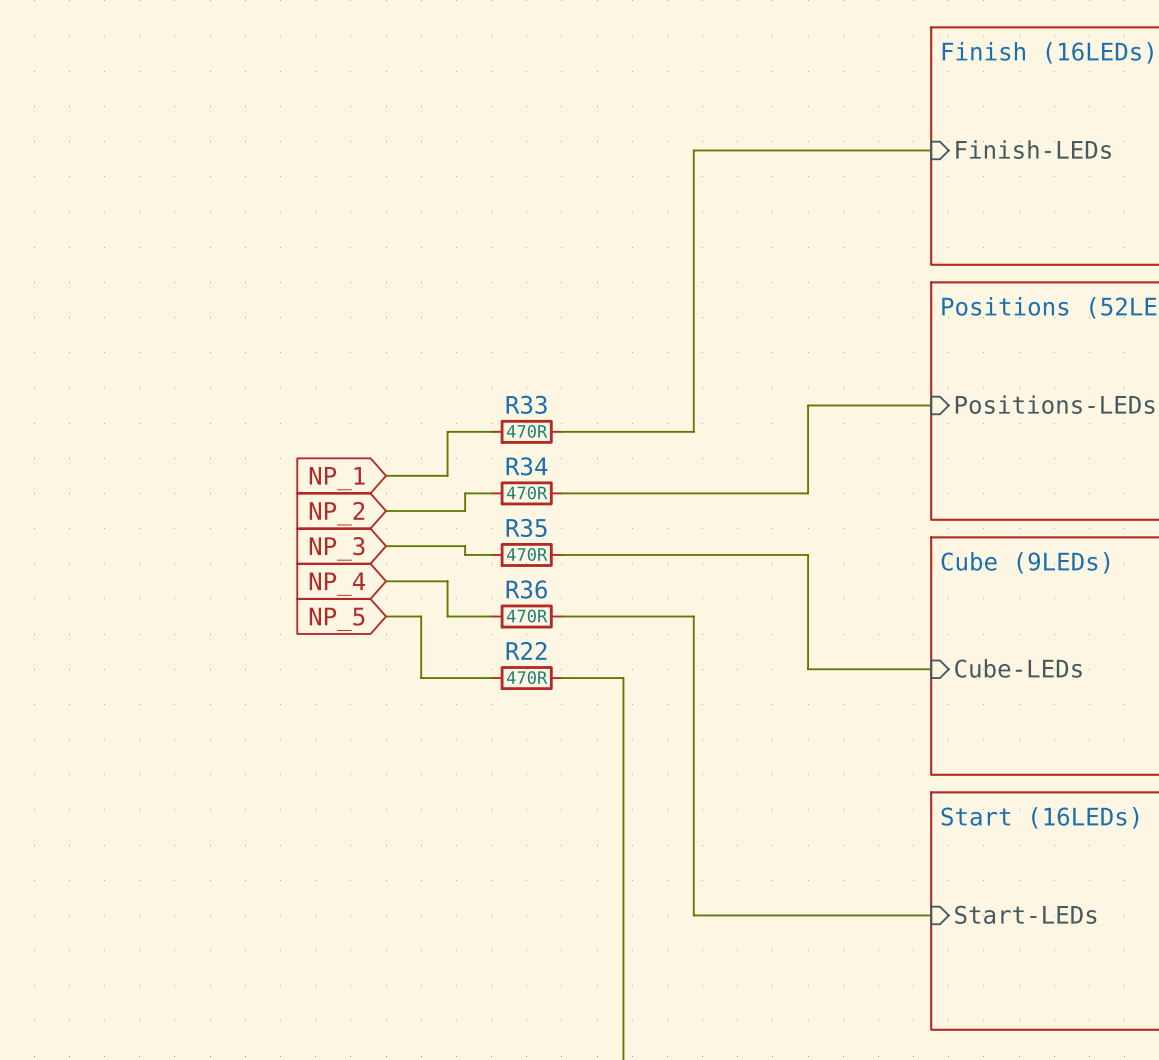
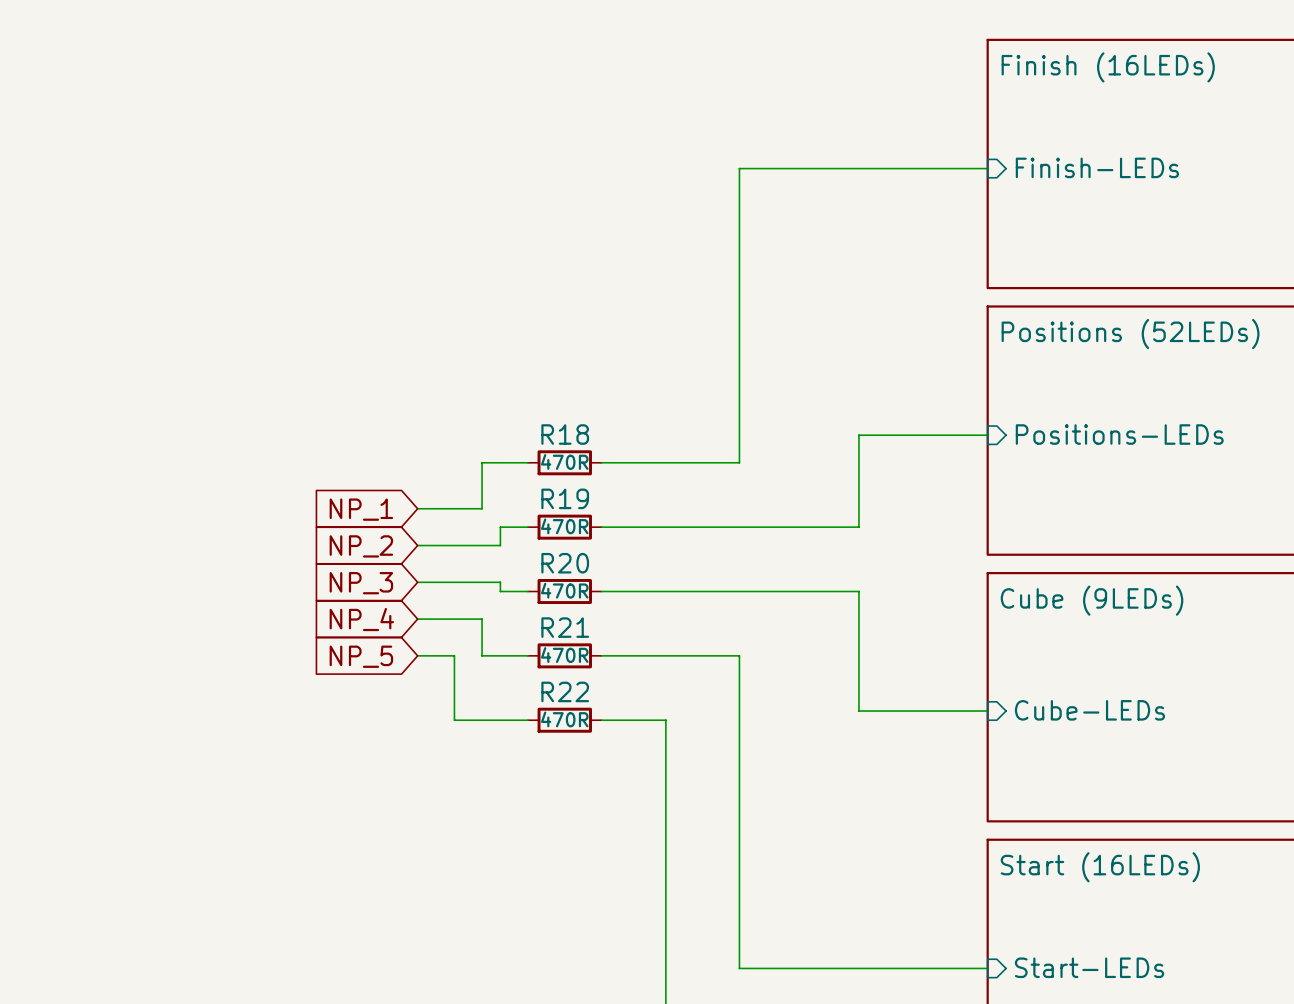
R33 name: R33 (526, 404) -> R18 (565, 434)
R34 name: R34 (526, 466) -> R19 (565, 498)
R35 name: R35 (526, 527) -> R20 (565, 563)
R36 name: R36 (526, 589) -> R21 (565, 627)

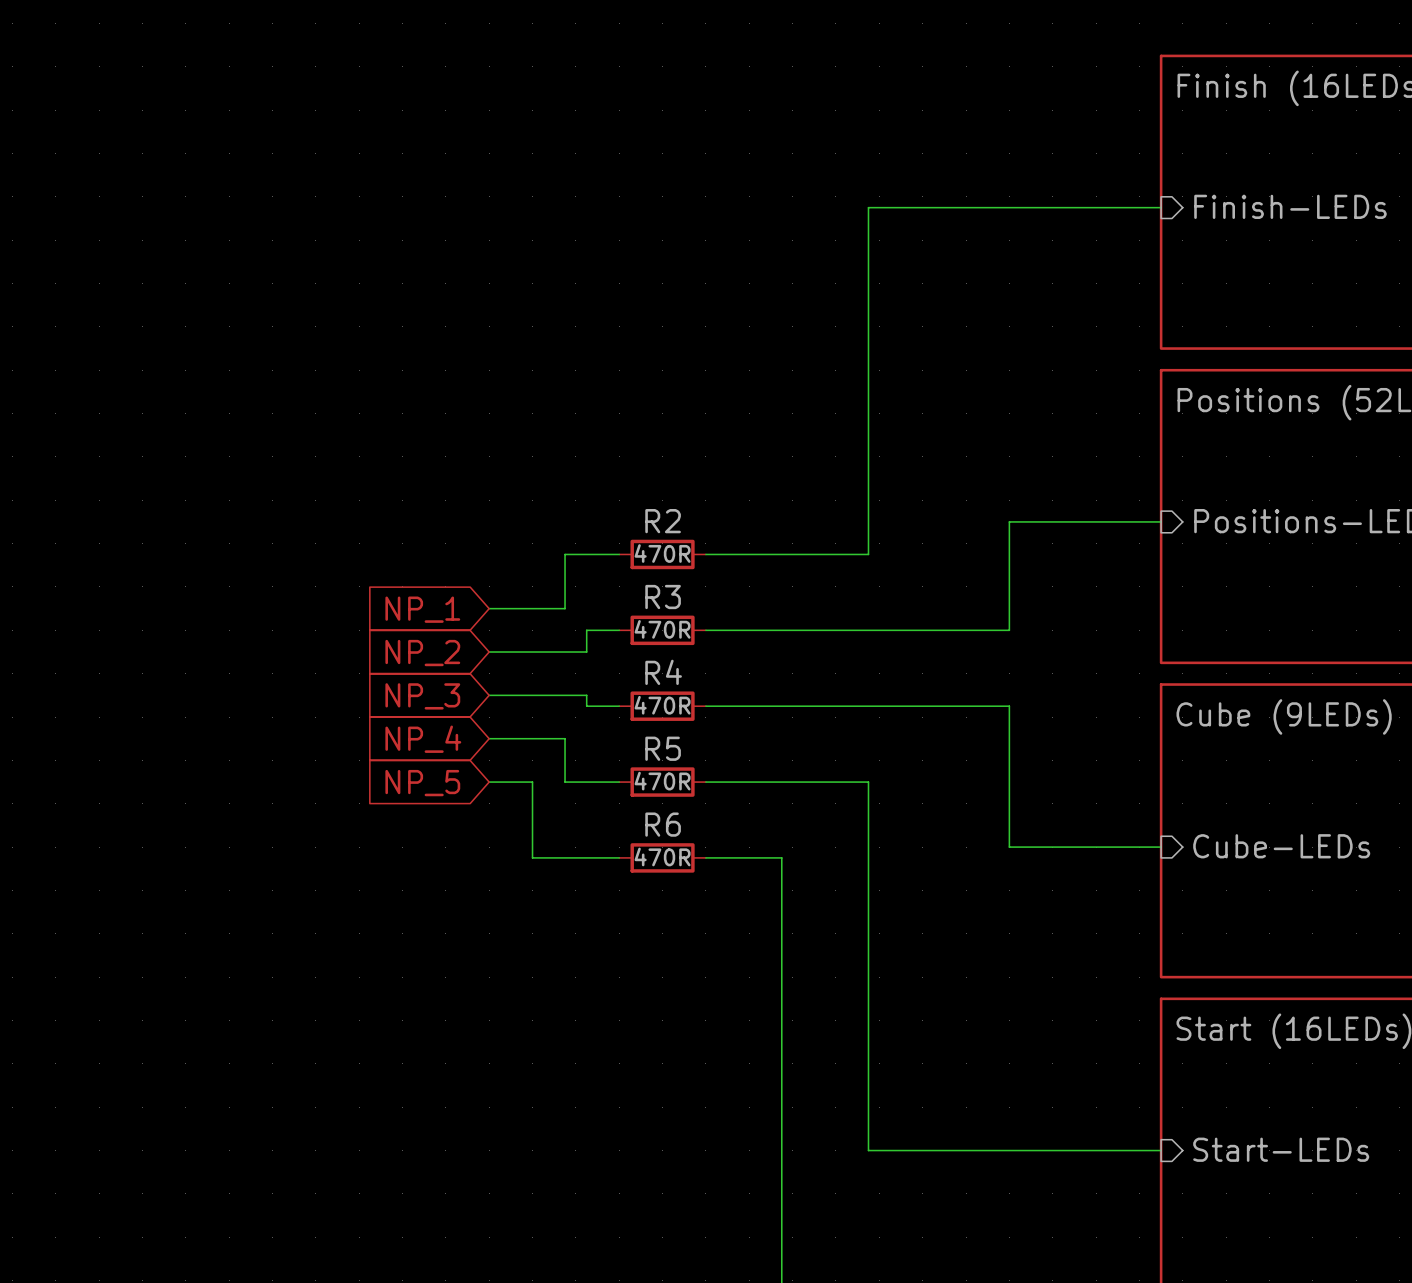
R18 name: R18 (565, 434) -> R2 (663, 521)
R19 name: R19 (565, 498) -> R3 (663, 597)
R20 name: R20 (565, 563) -> R4 (663, 672)
R21 name: R21 (565, 627) -> R5 (663, 748)
R22 name: R22 (565, 691) -> R6 (663, 824)

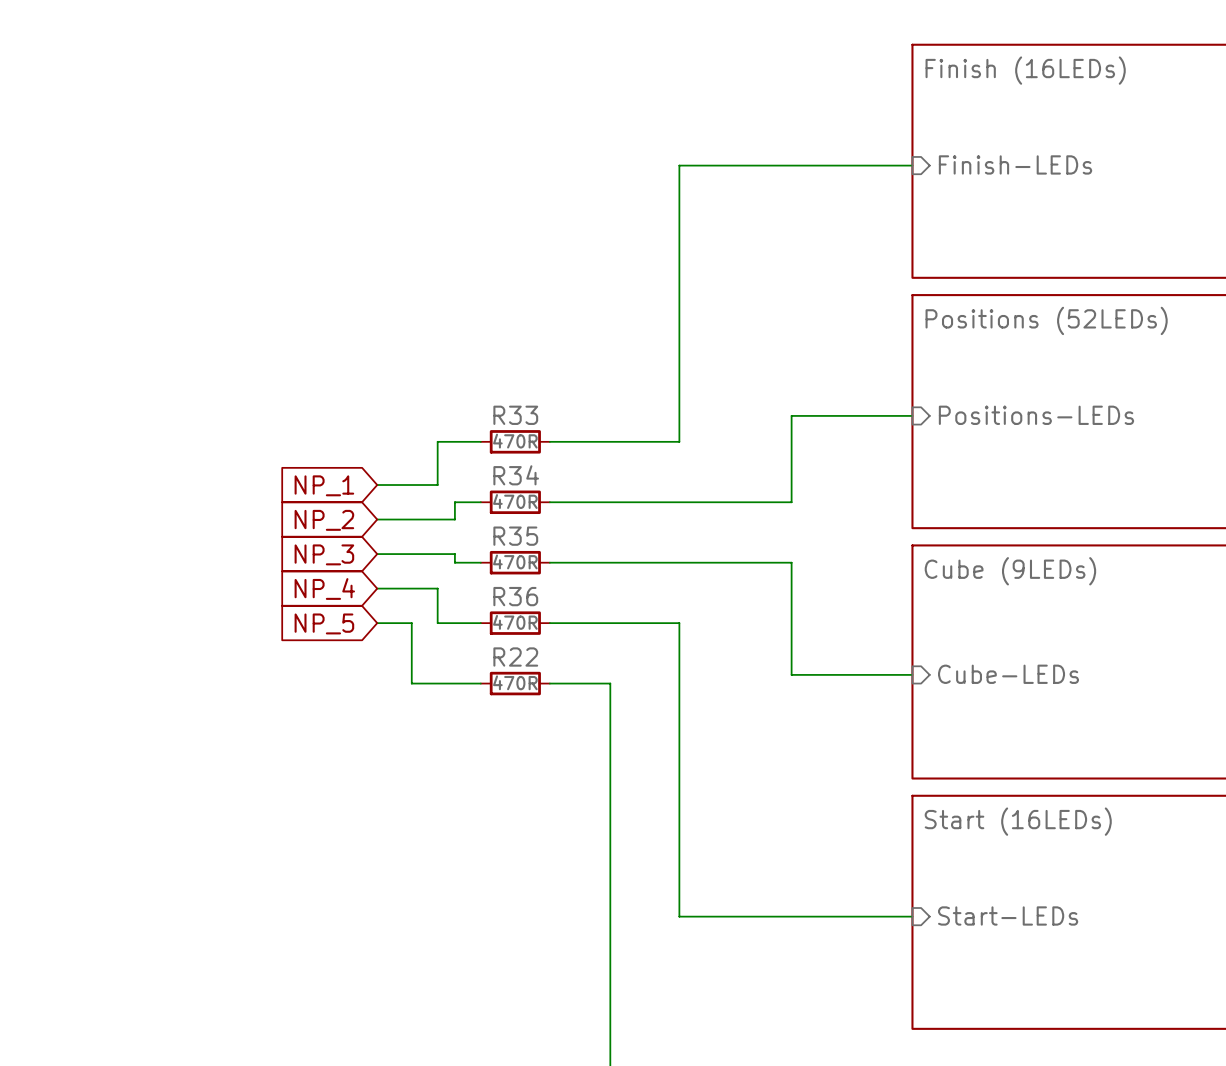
R2 name: R2 (663, 521) -> R33 (515, 415)
R3 name: R3 (663, 597) -> R34 (516, 475)
R4 name: R4 (663, 672) -> R35 (515, 536)
R5 name: R5 (663, 748) -> R36 (515, 596)
R6 name: R6 (663, 824) -> R22 (515, 657)

